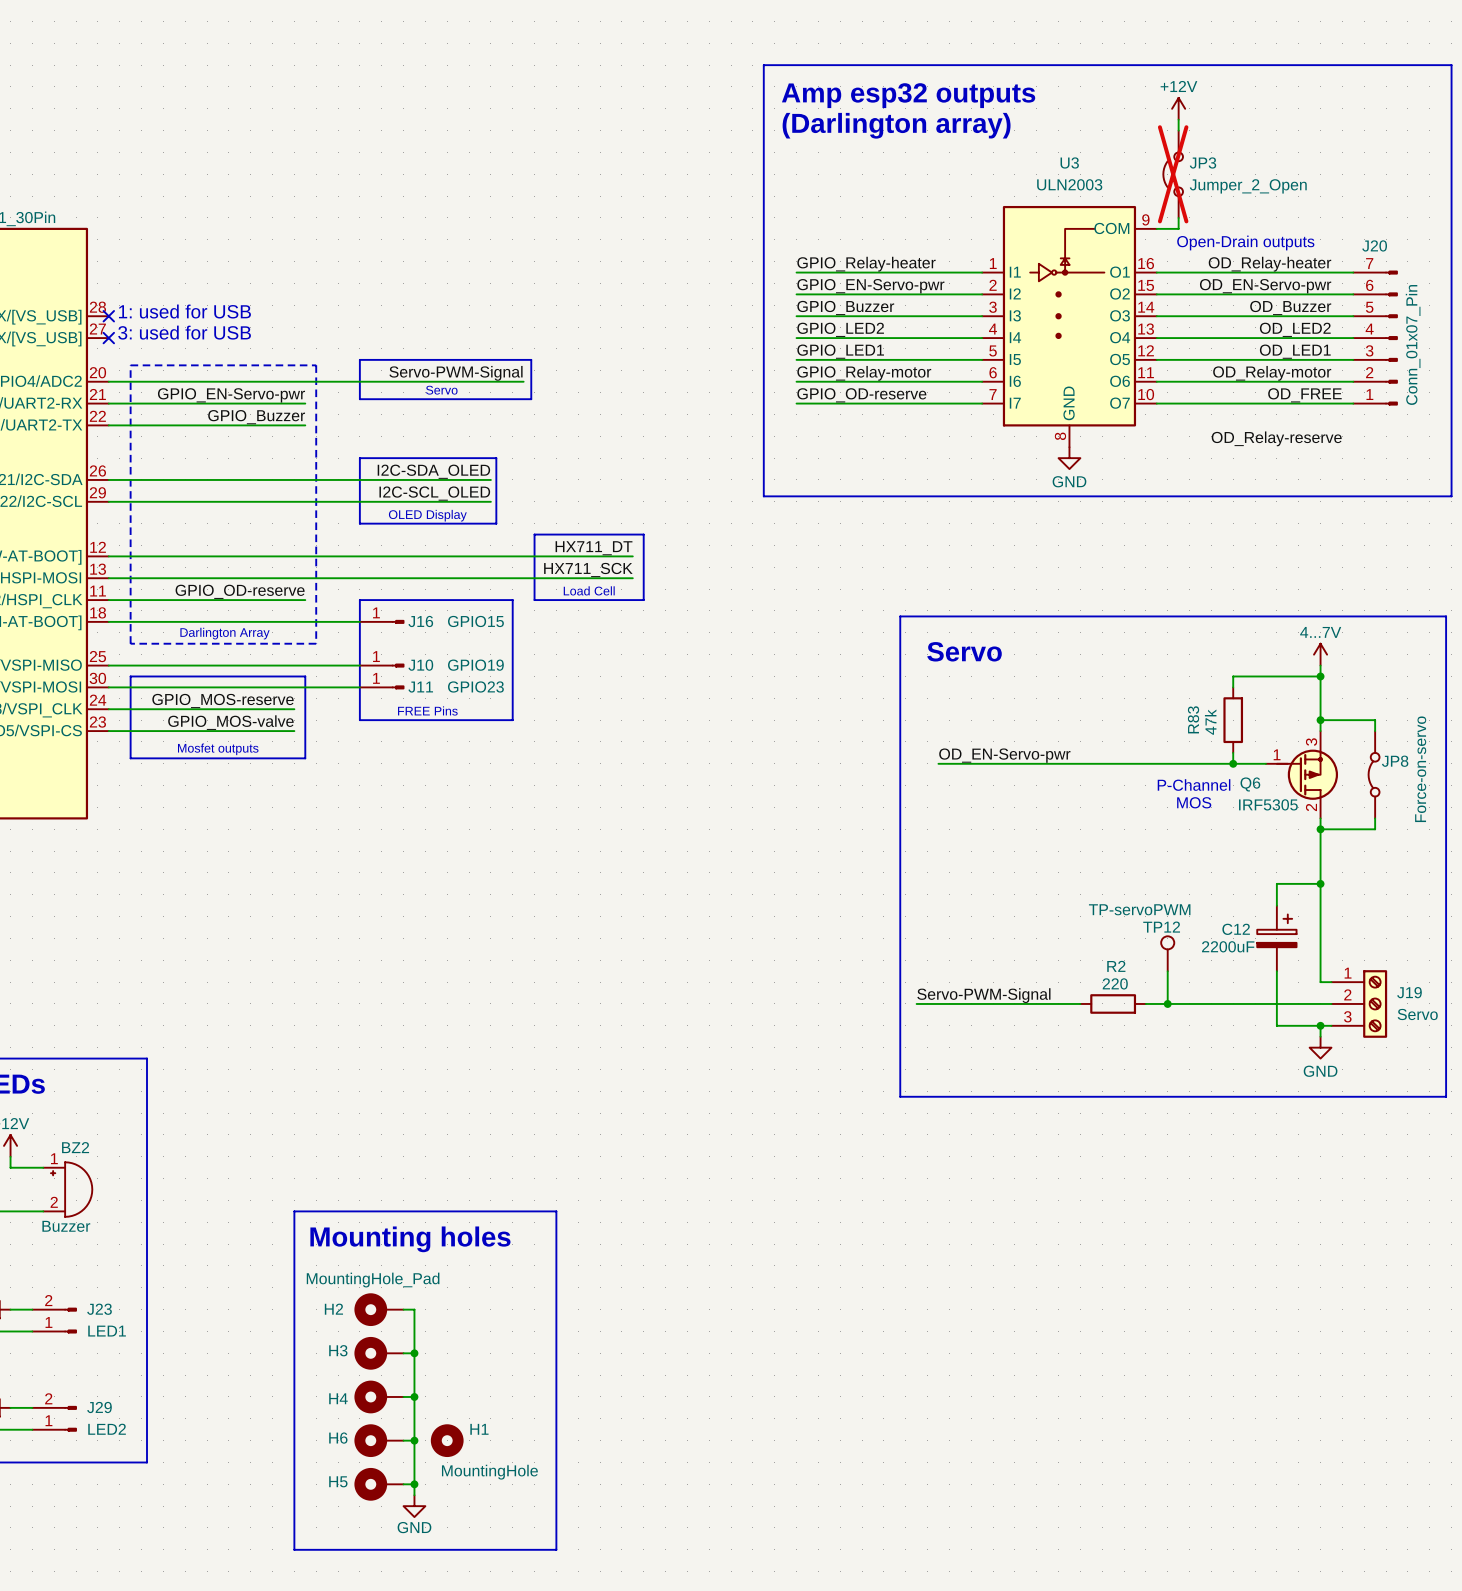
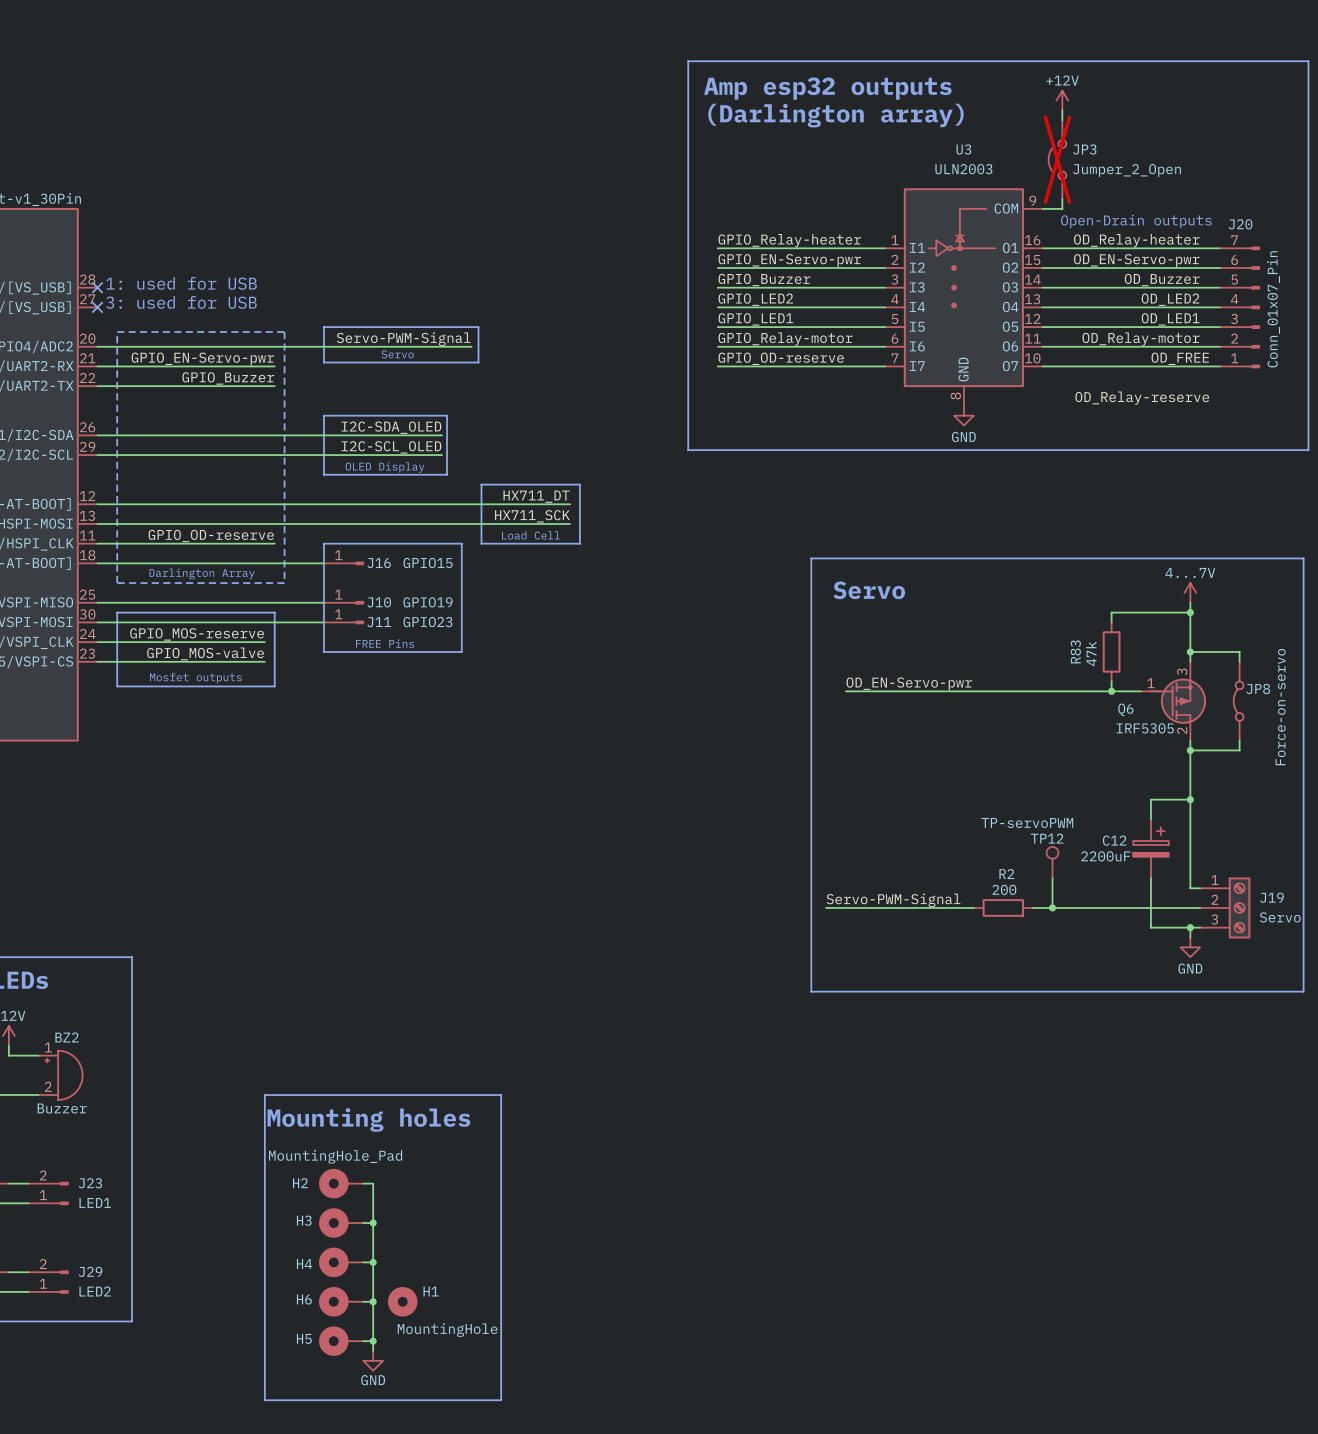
text: P-Channel (1194, 785) -> none
text: MOS (1194, 802) -> none
R2 value: 220 (1115, 983) -> 200 (1004, 889)

